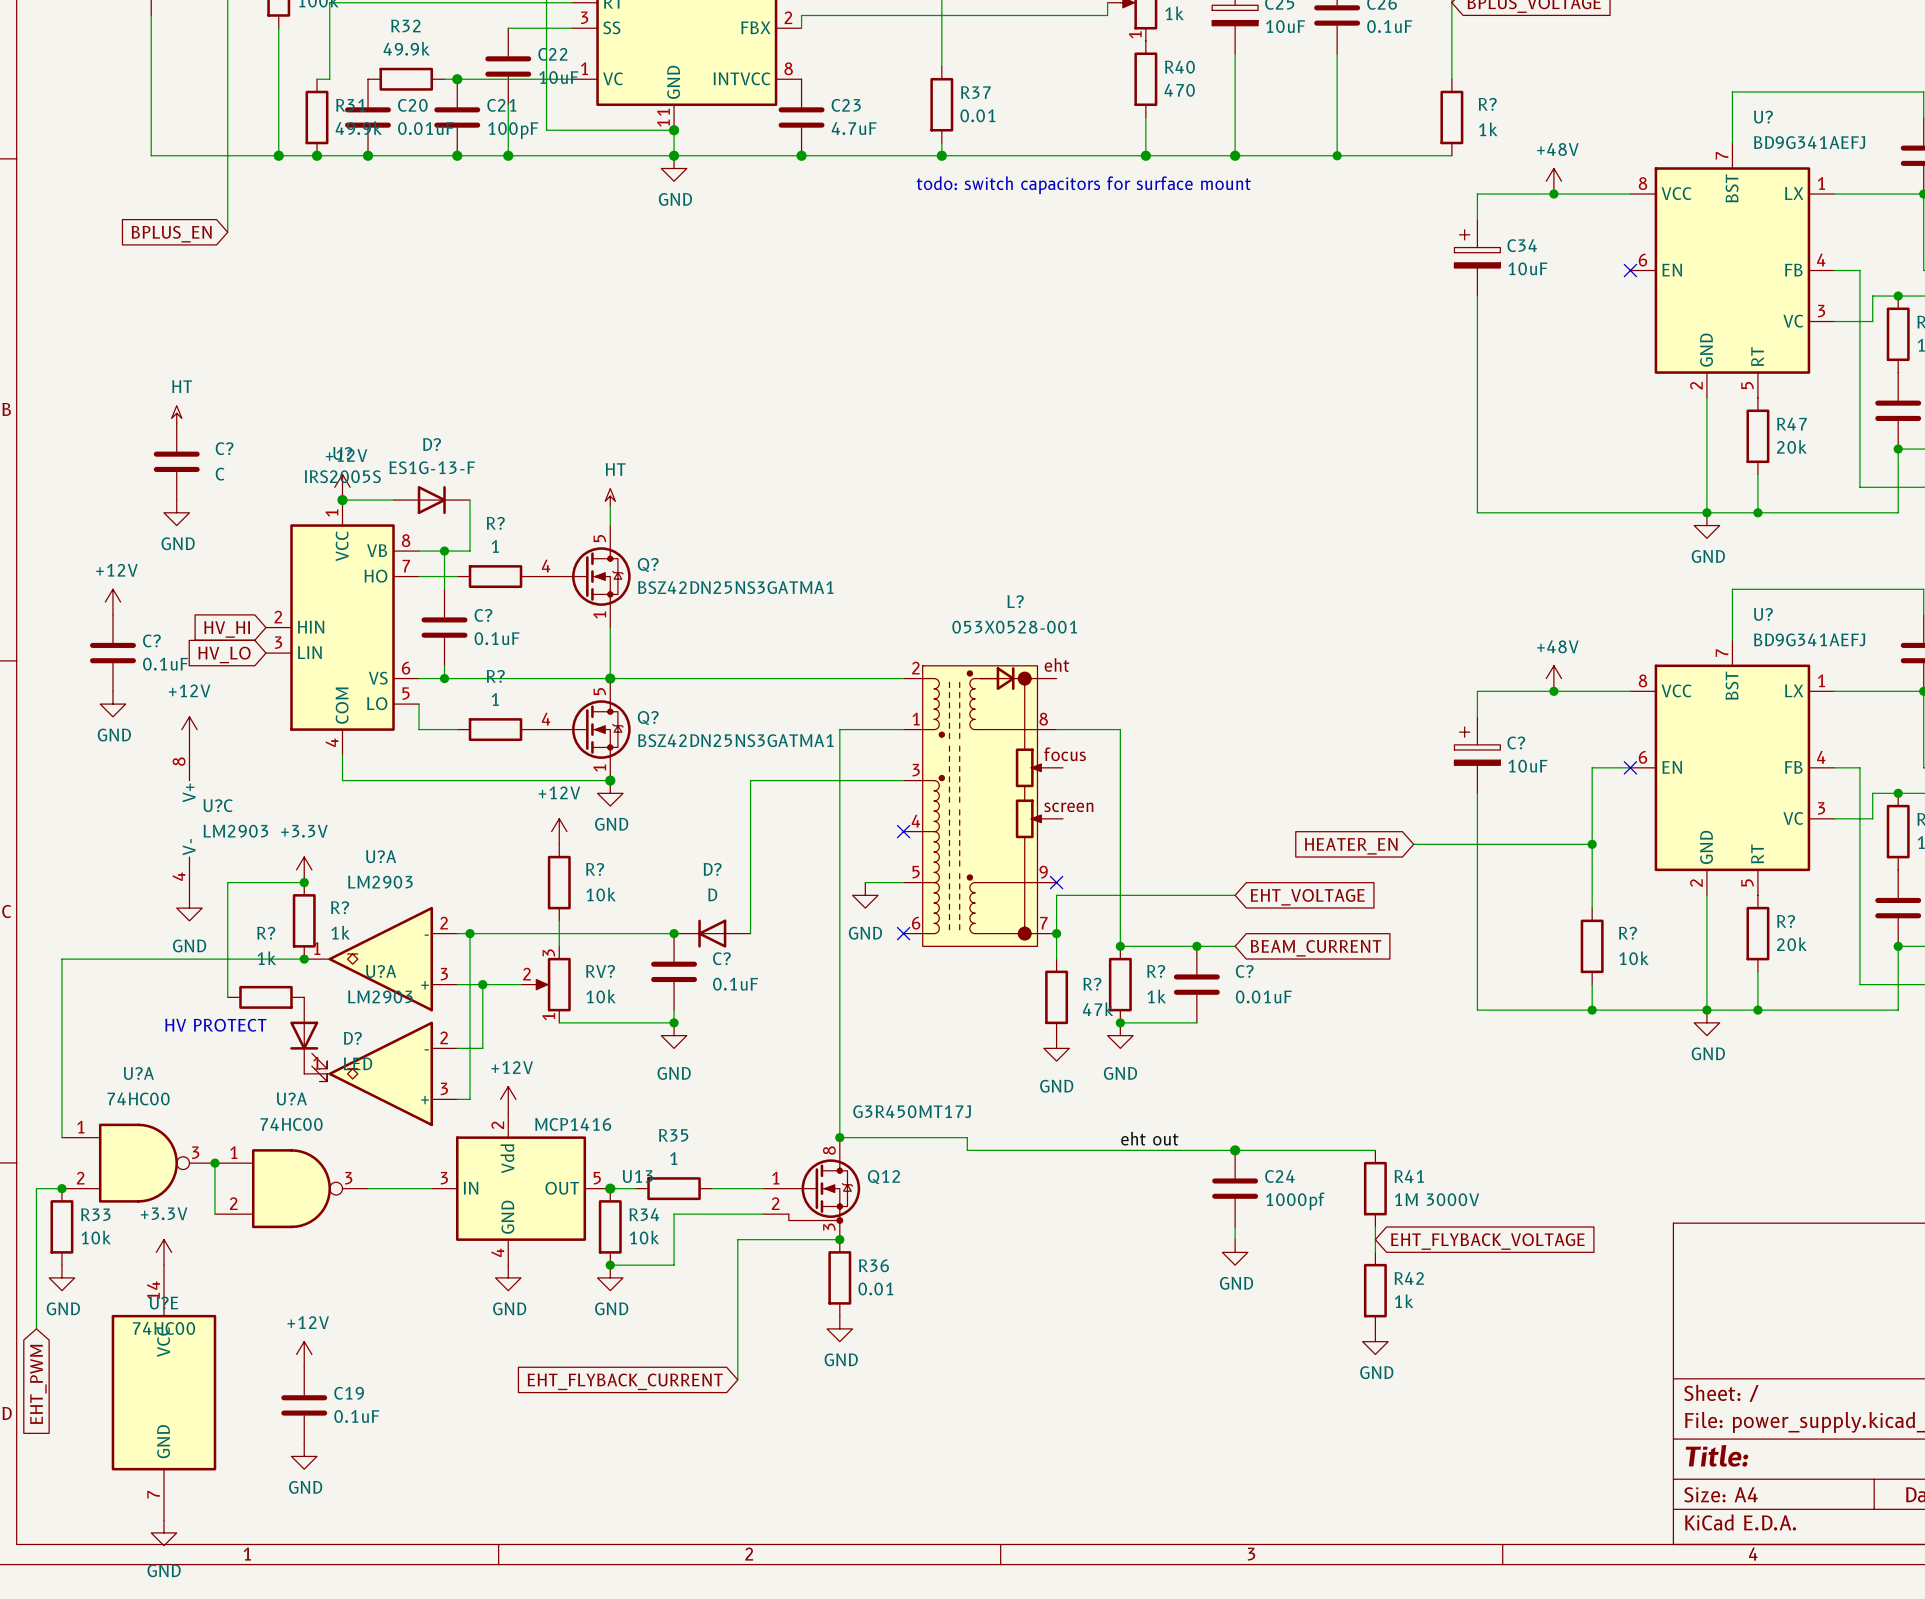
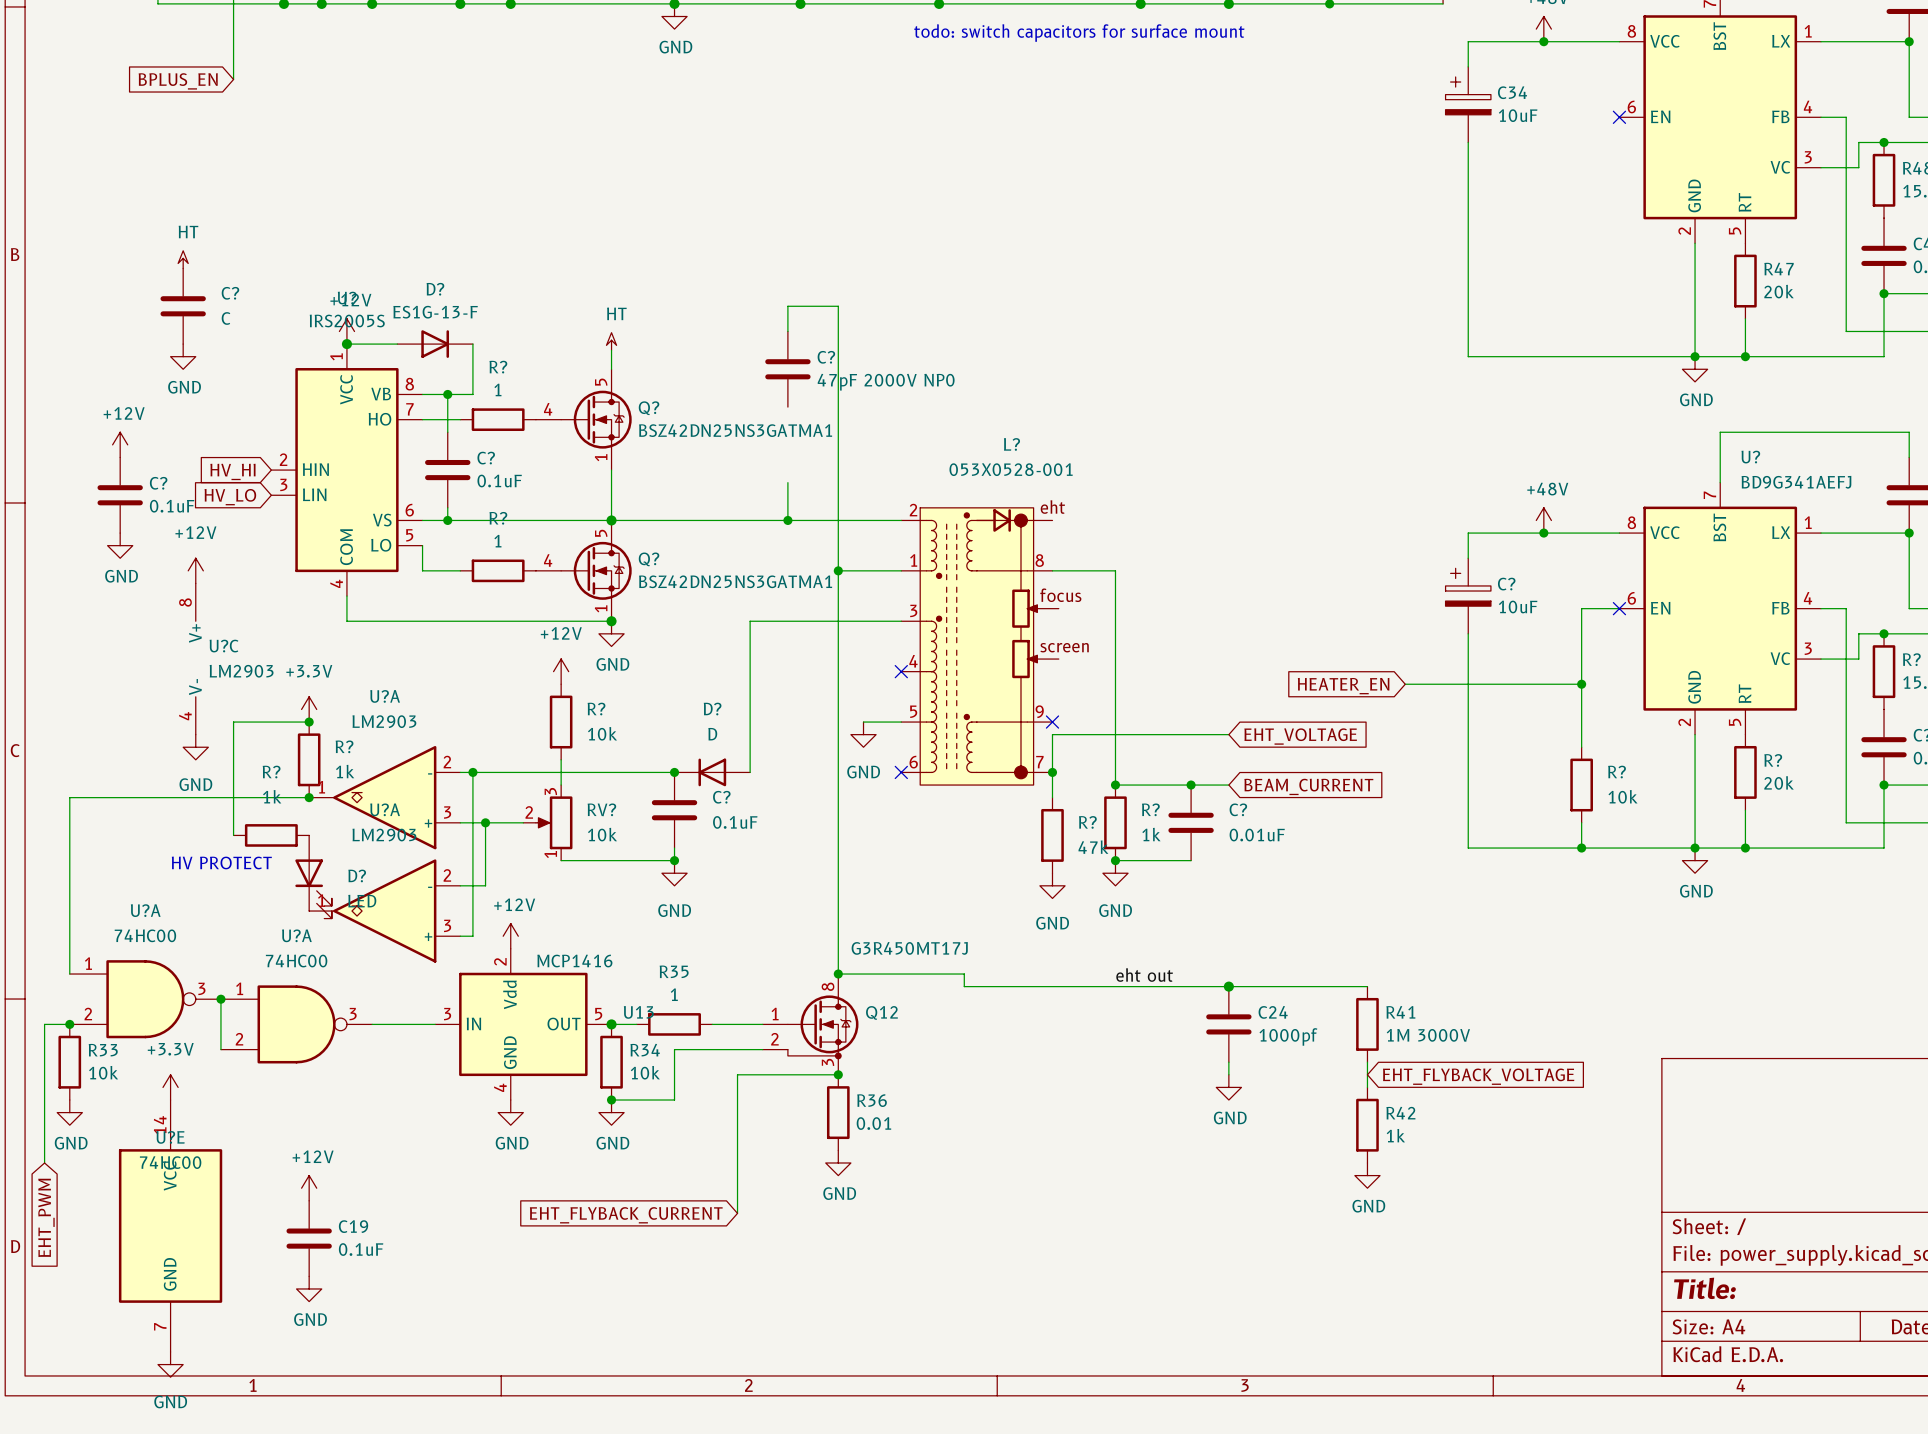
wire: none -> (787, 331) (787, 306) (838, 306) (838, 570)
C?: none -> 47pF 2000V NP0 (787, 369)
wire: none -> (787, 482) (787, 520)
junction: none -> (787, 520)
junction: none -> (838, 570)

